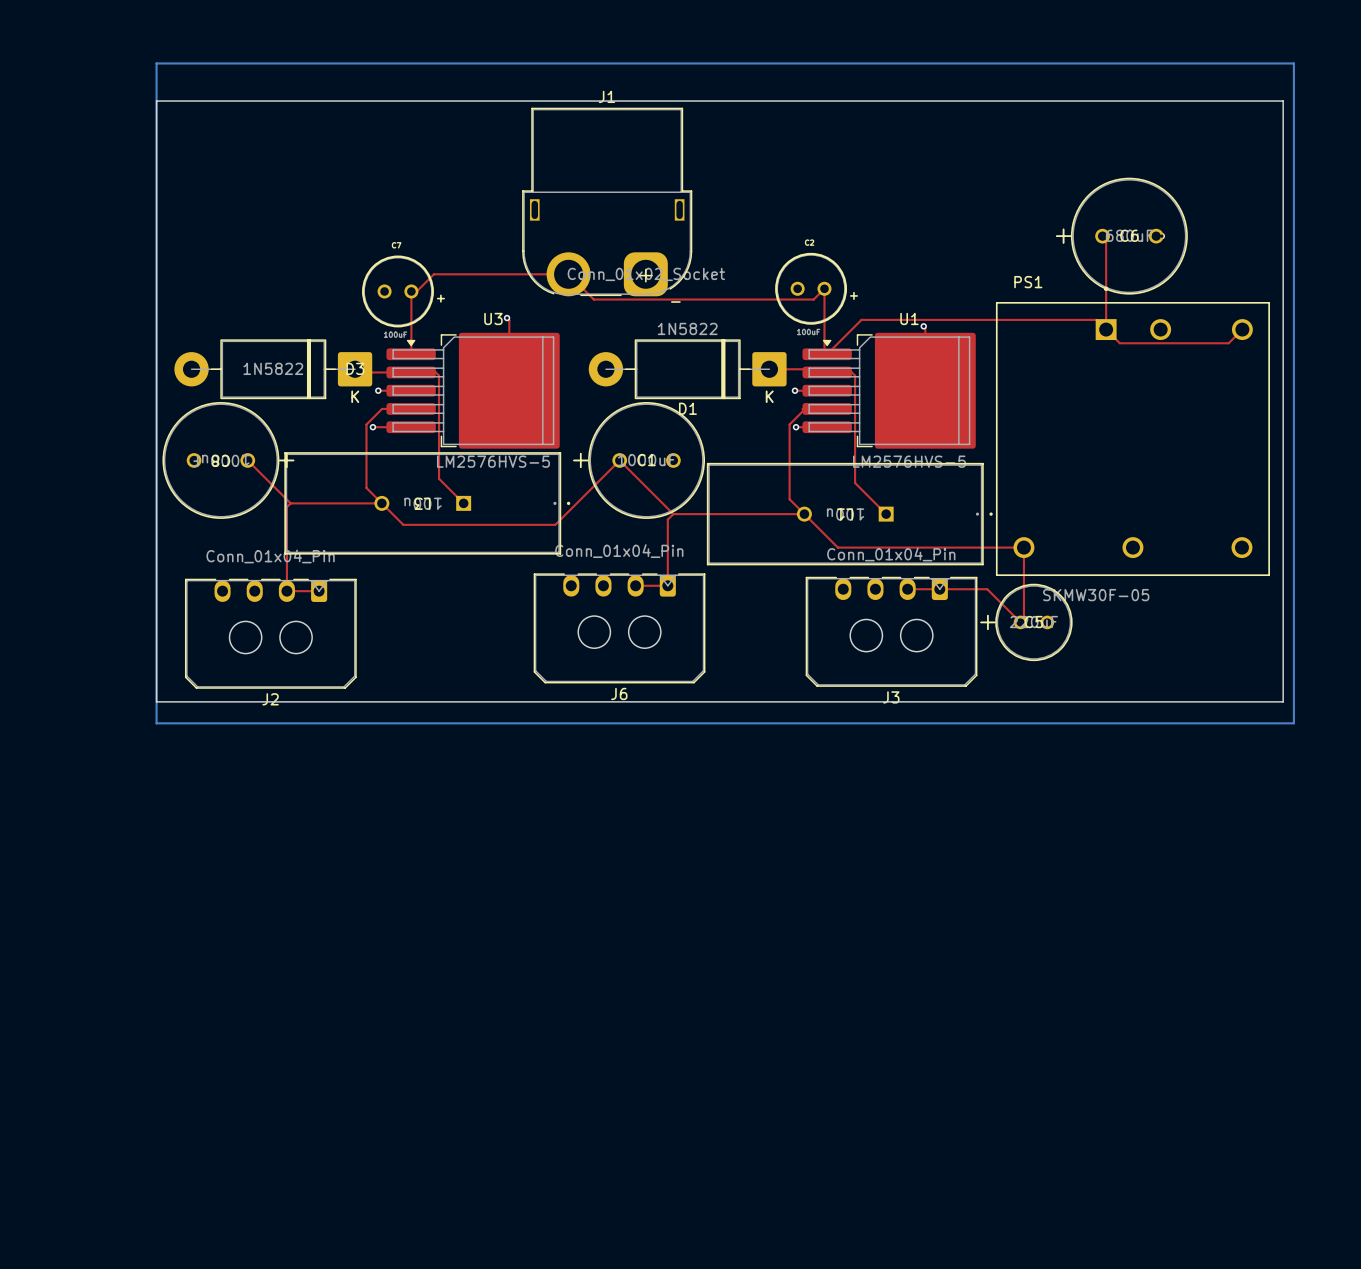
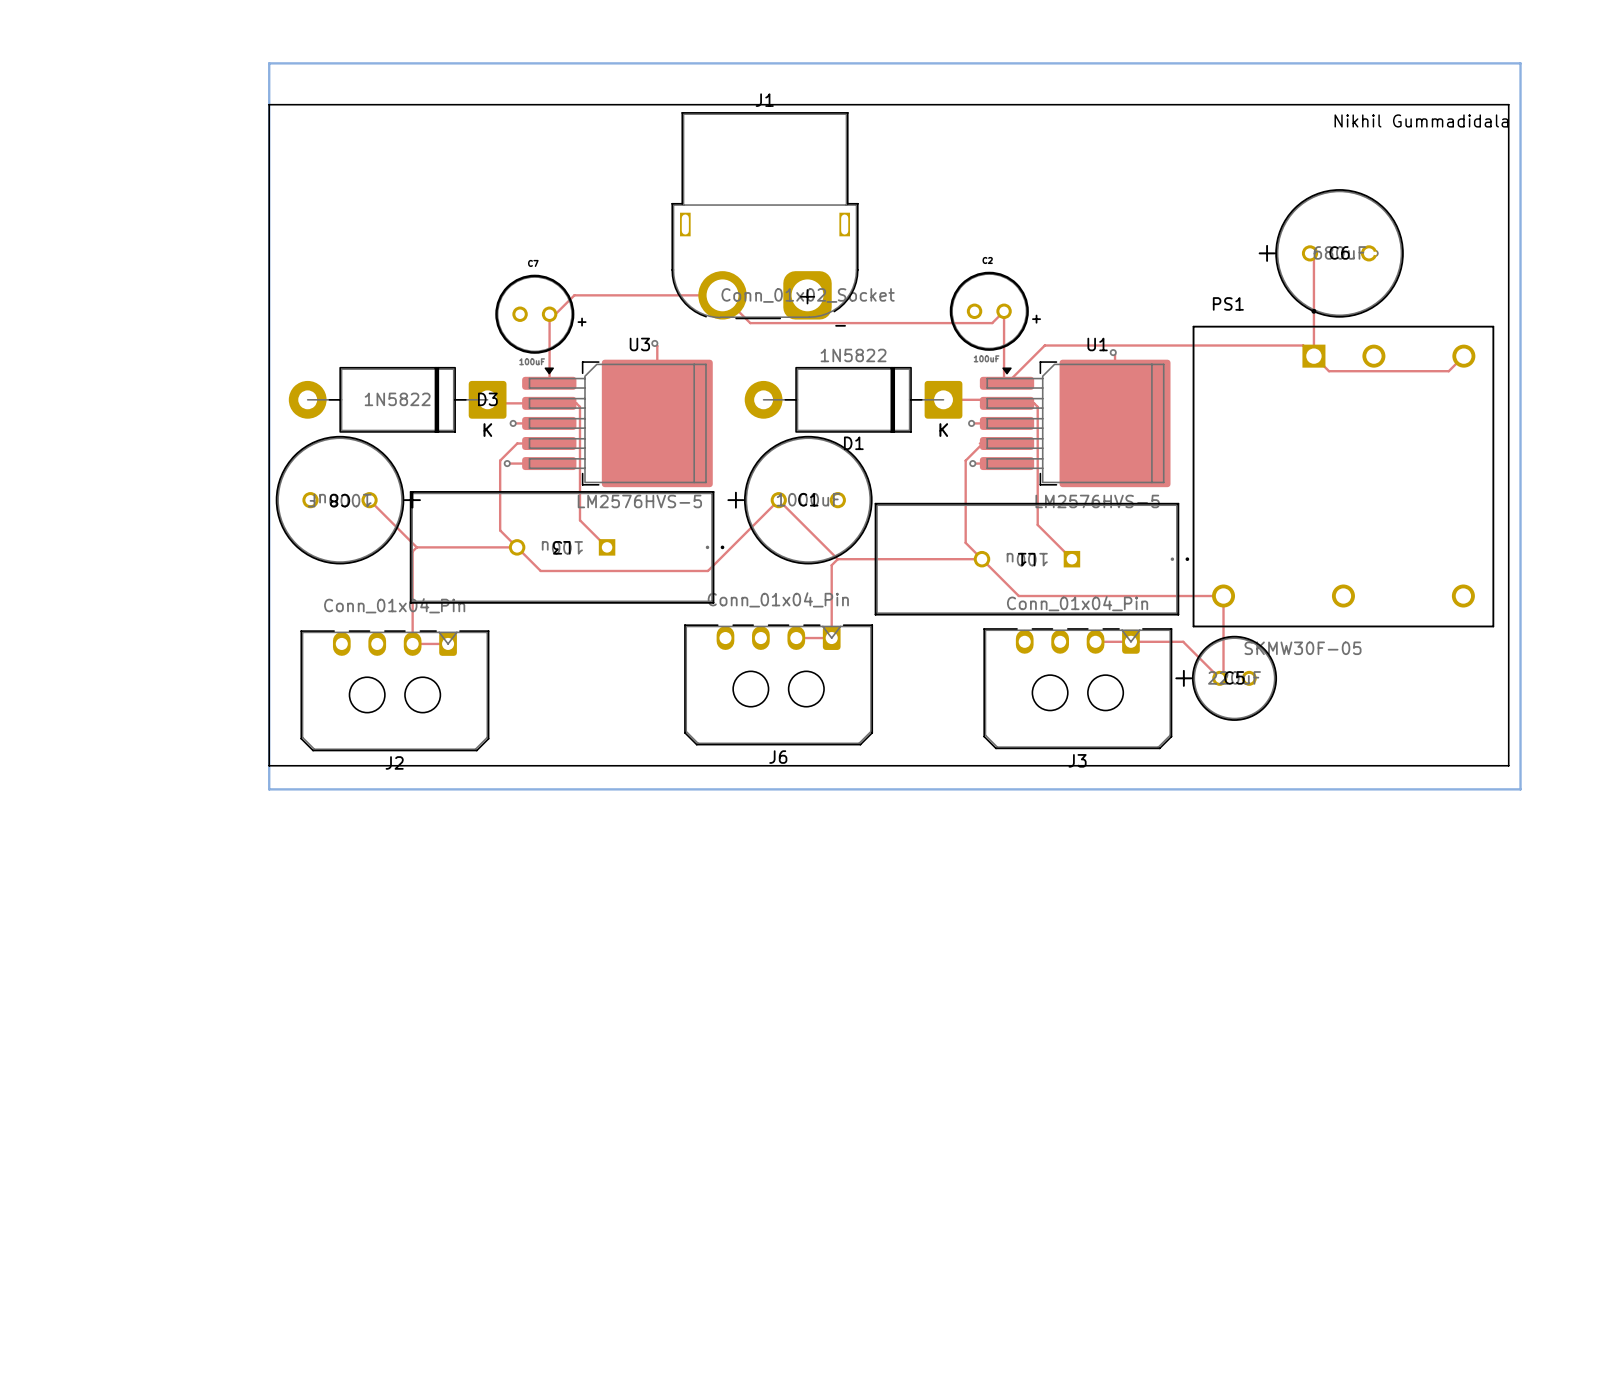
text: none -> Nikhil Gummadidala (1421, 120)

